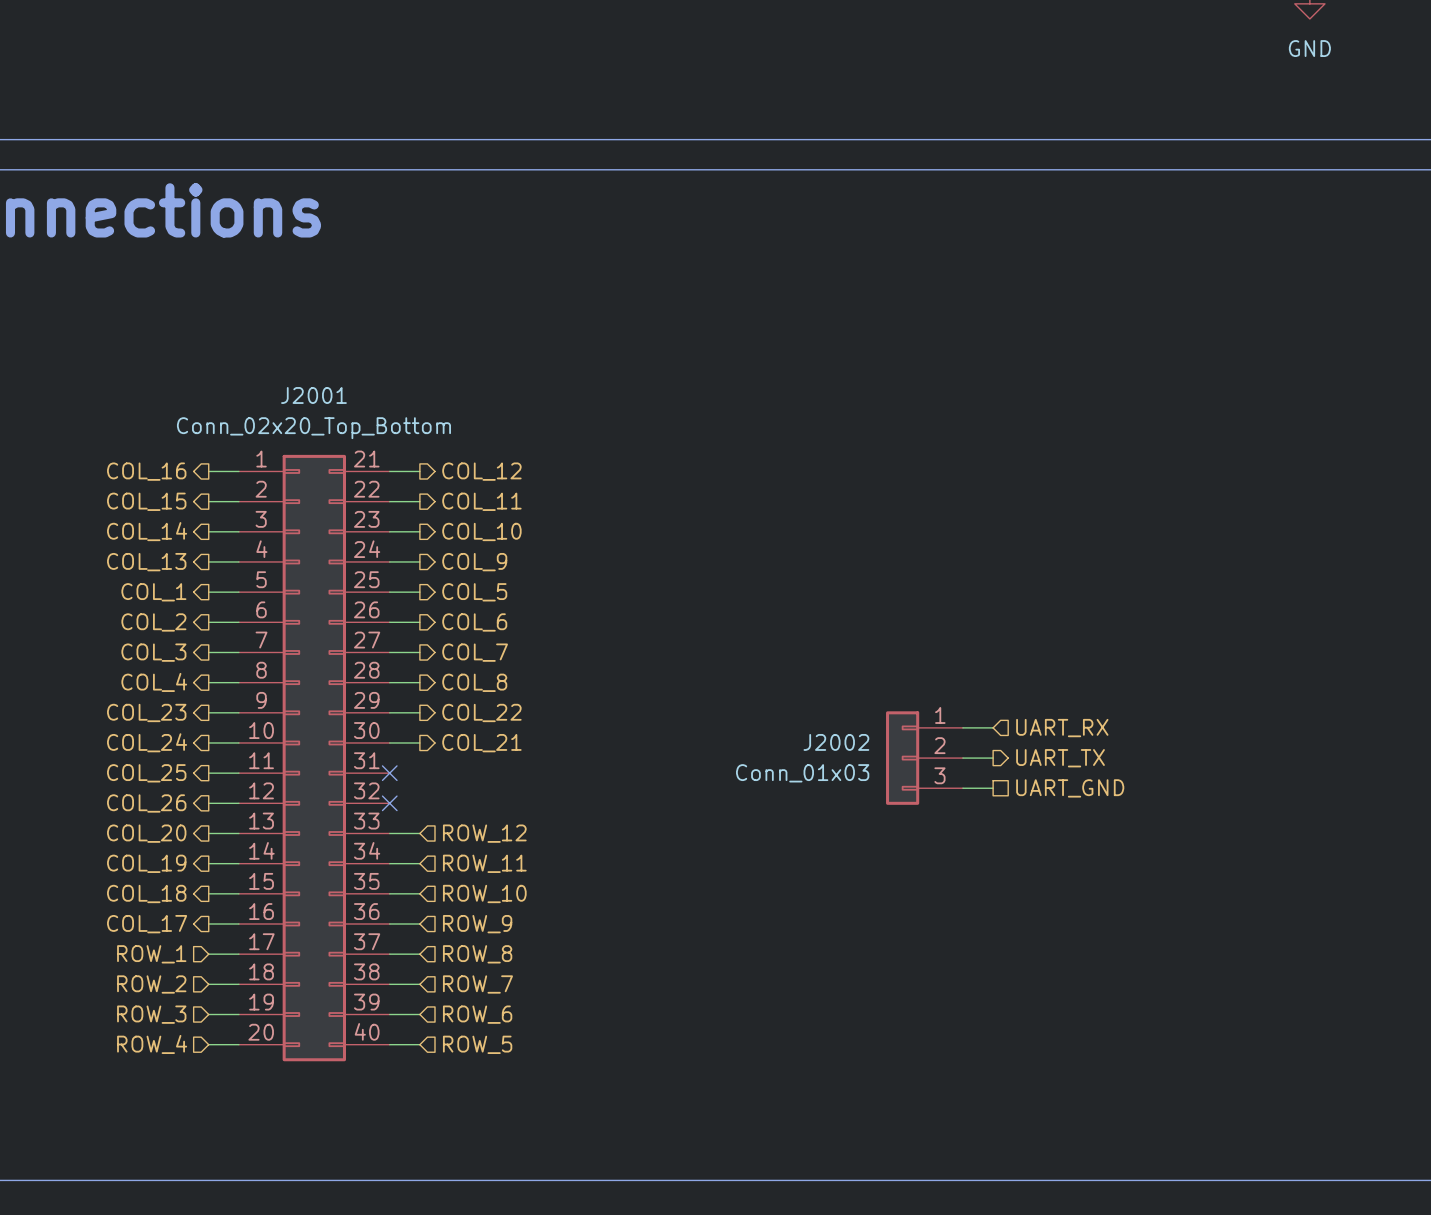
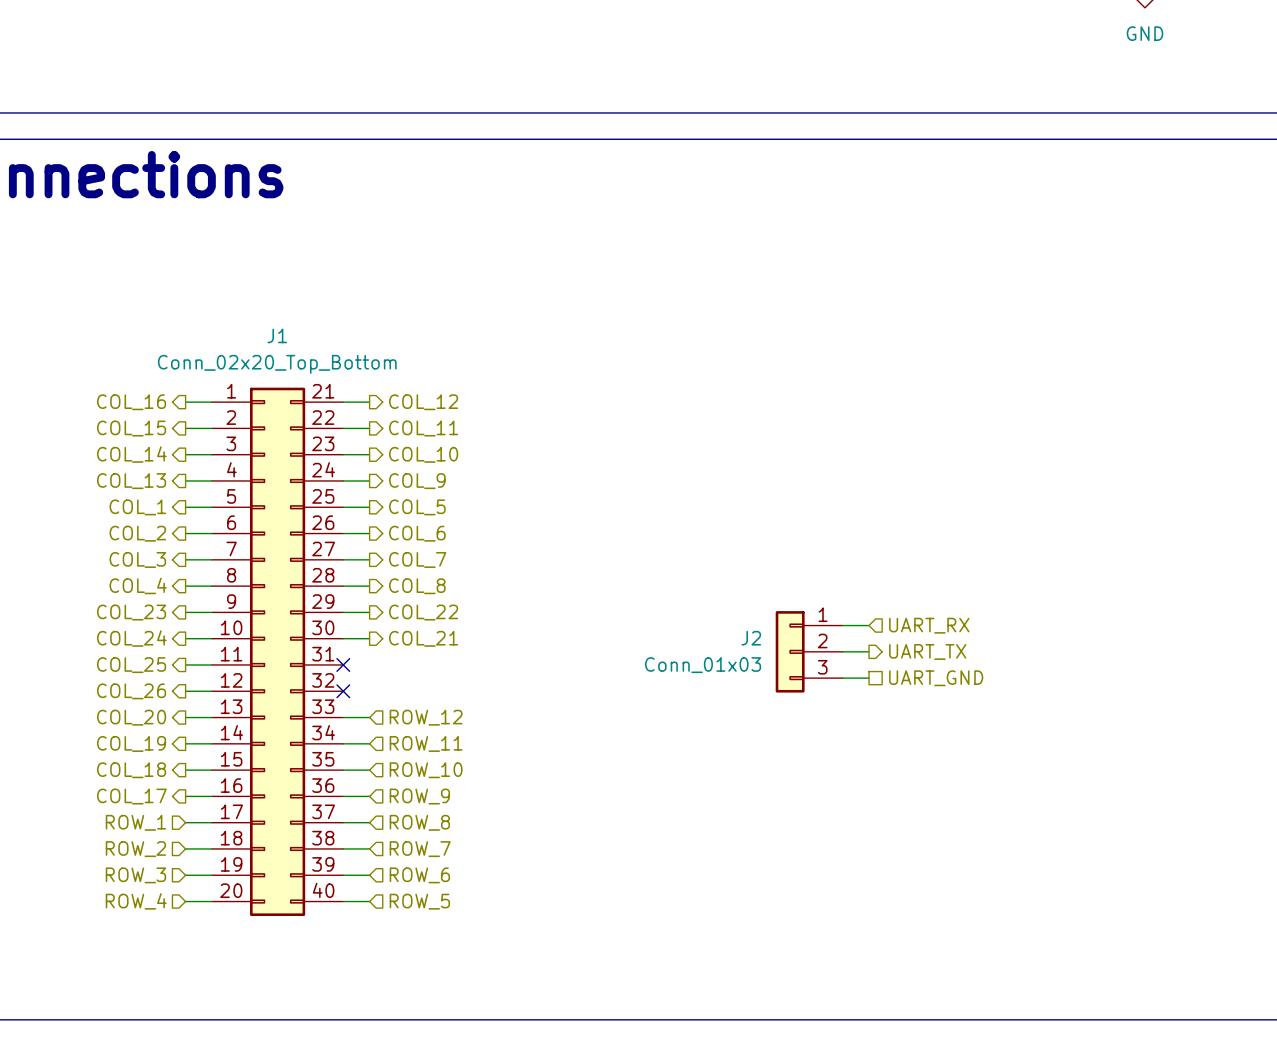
J2001 name: J2001 (313, 395) -> J1 (277, 335)
J2002 name: J2002 (836, 742) -> J2 (751, 638)

